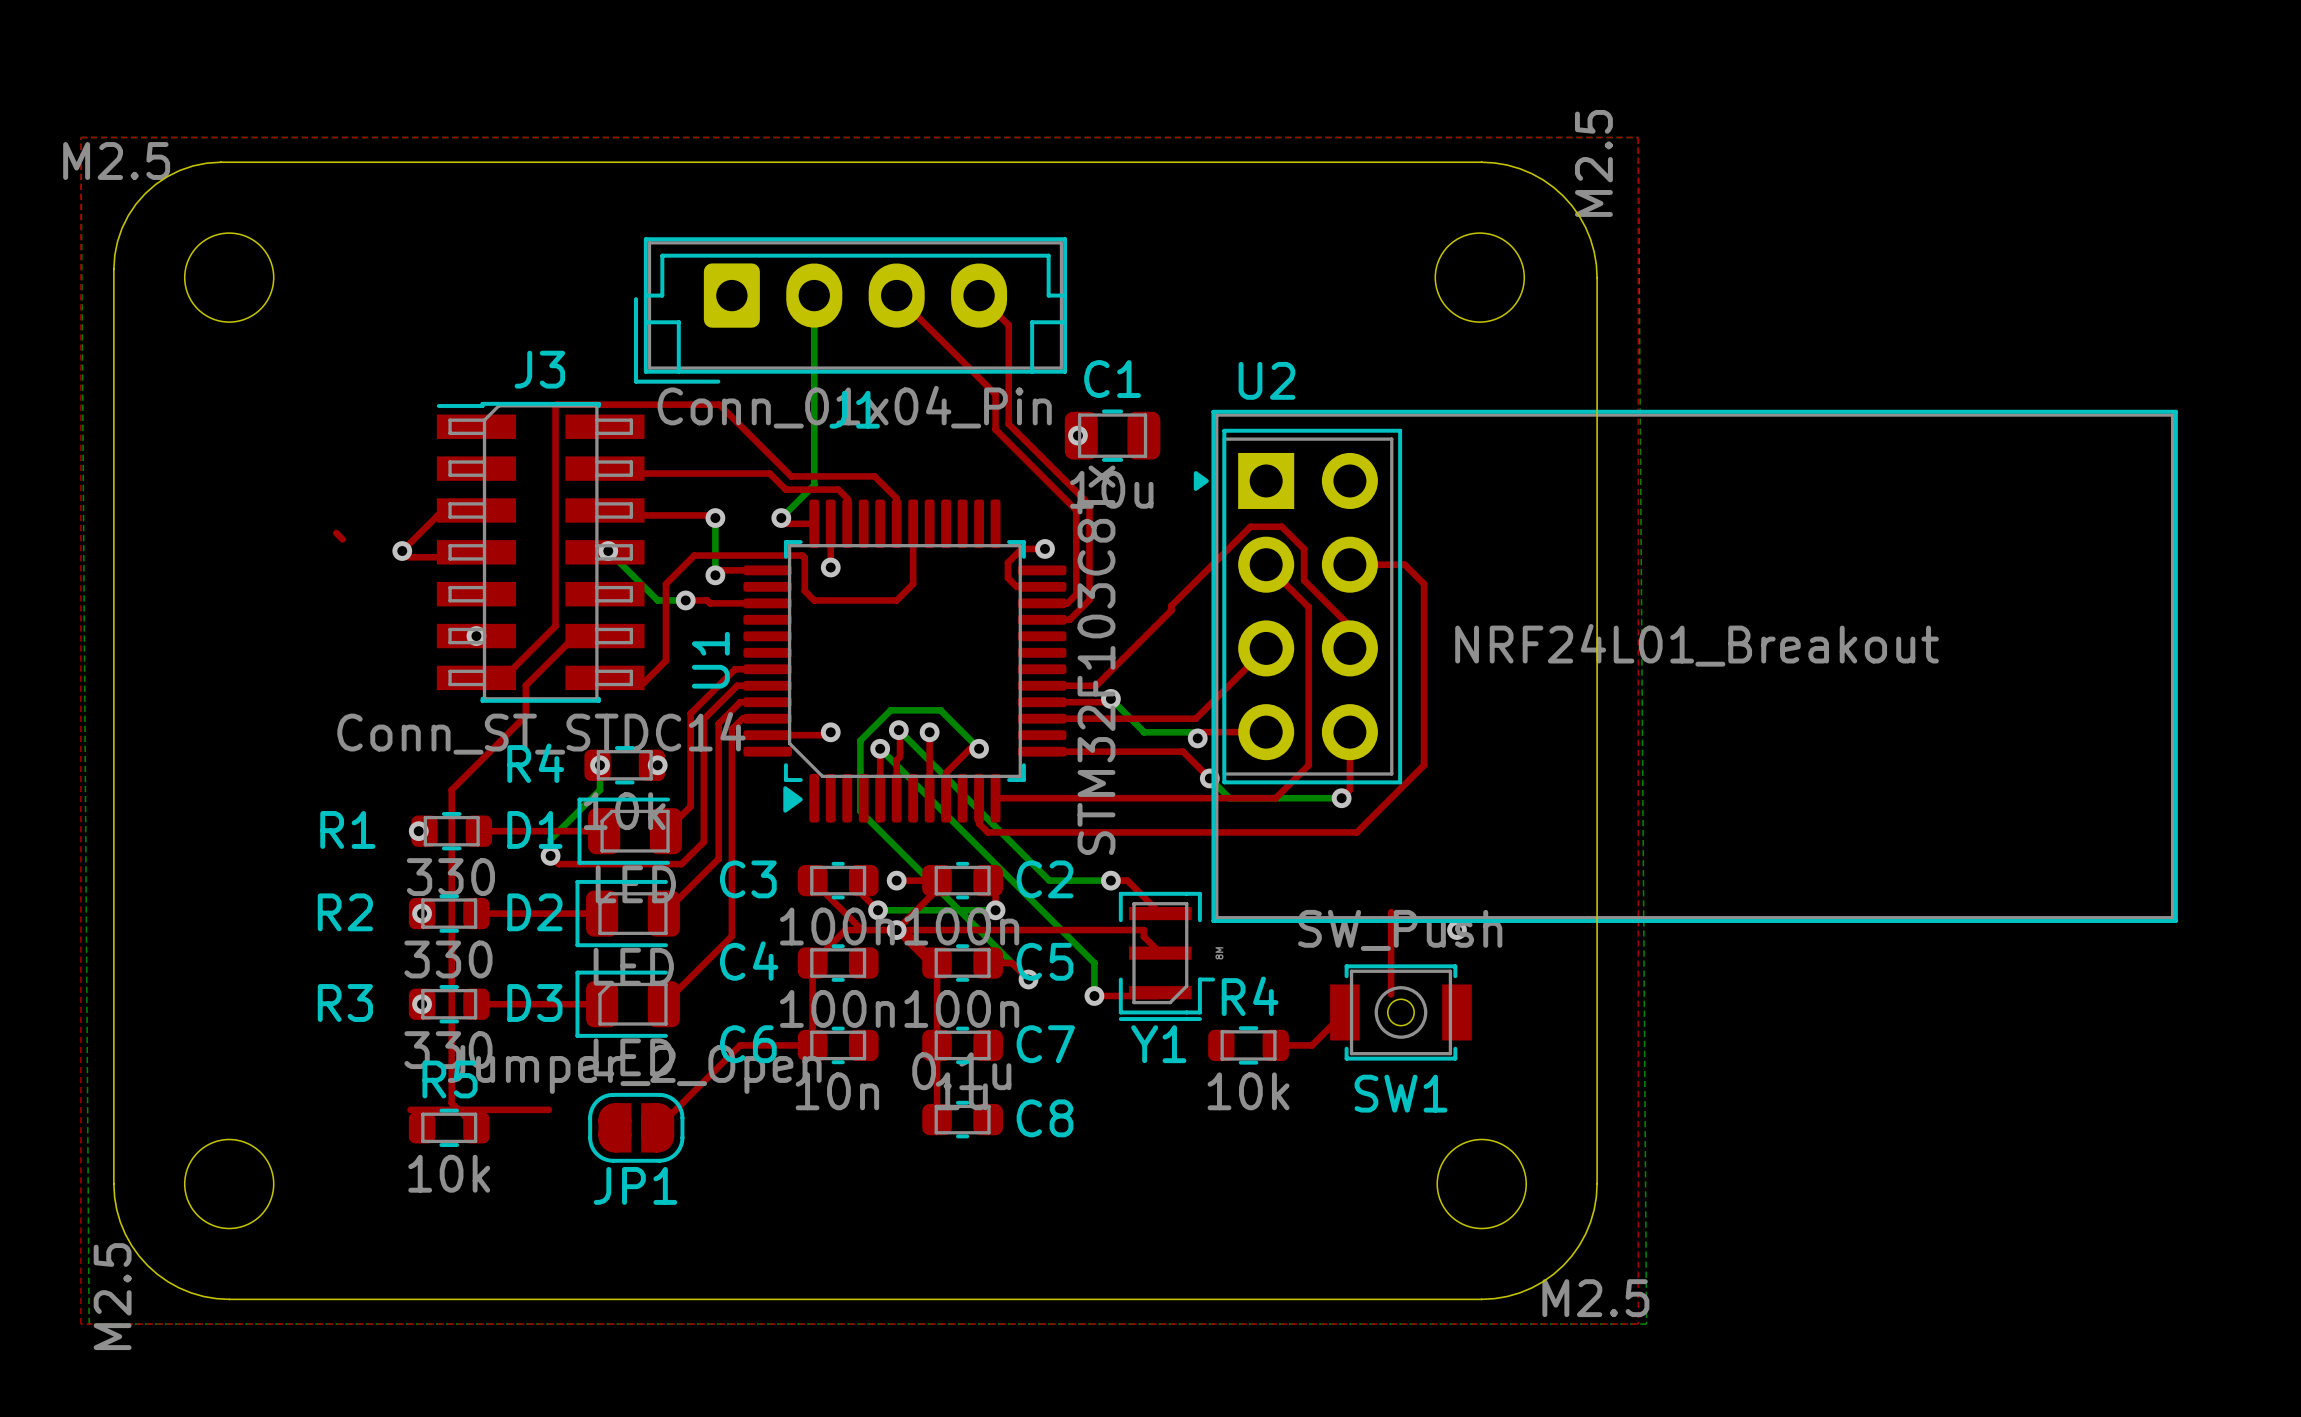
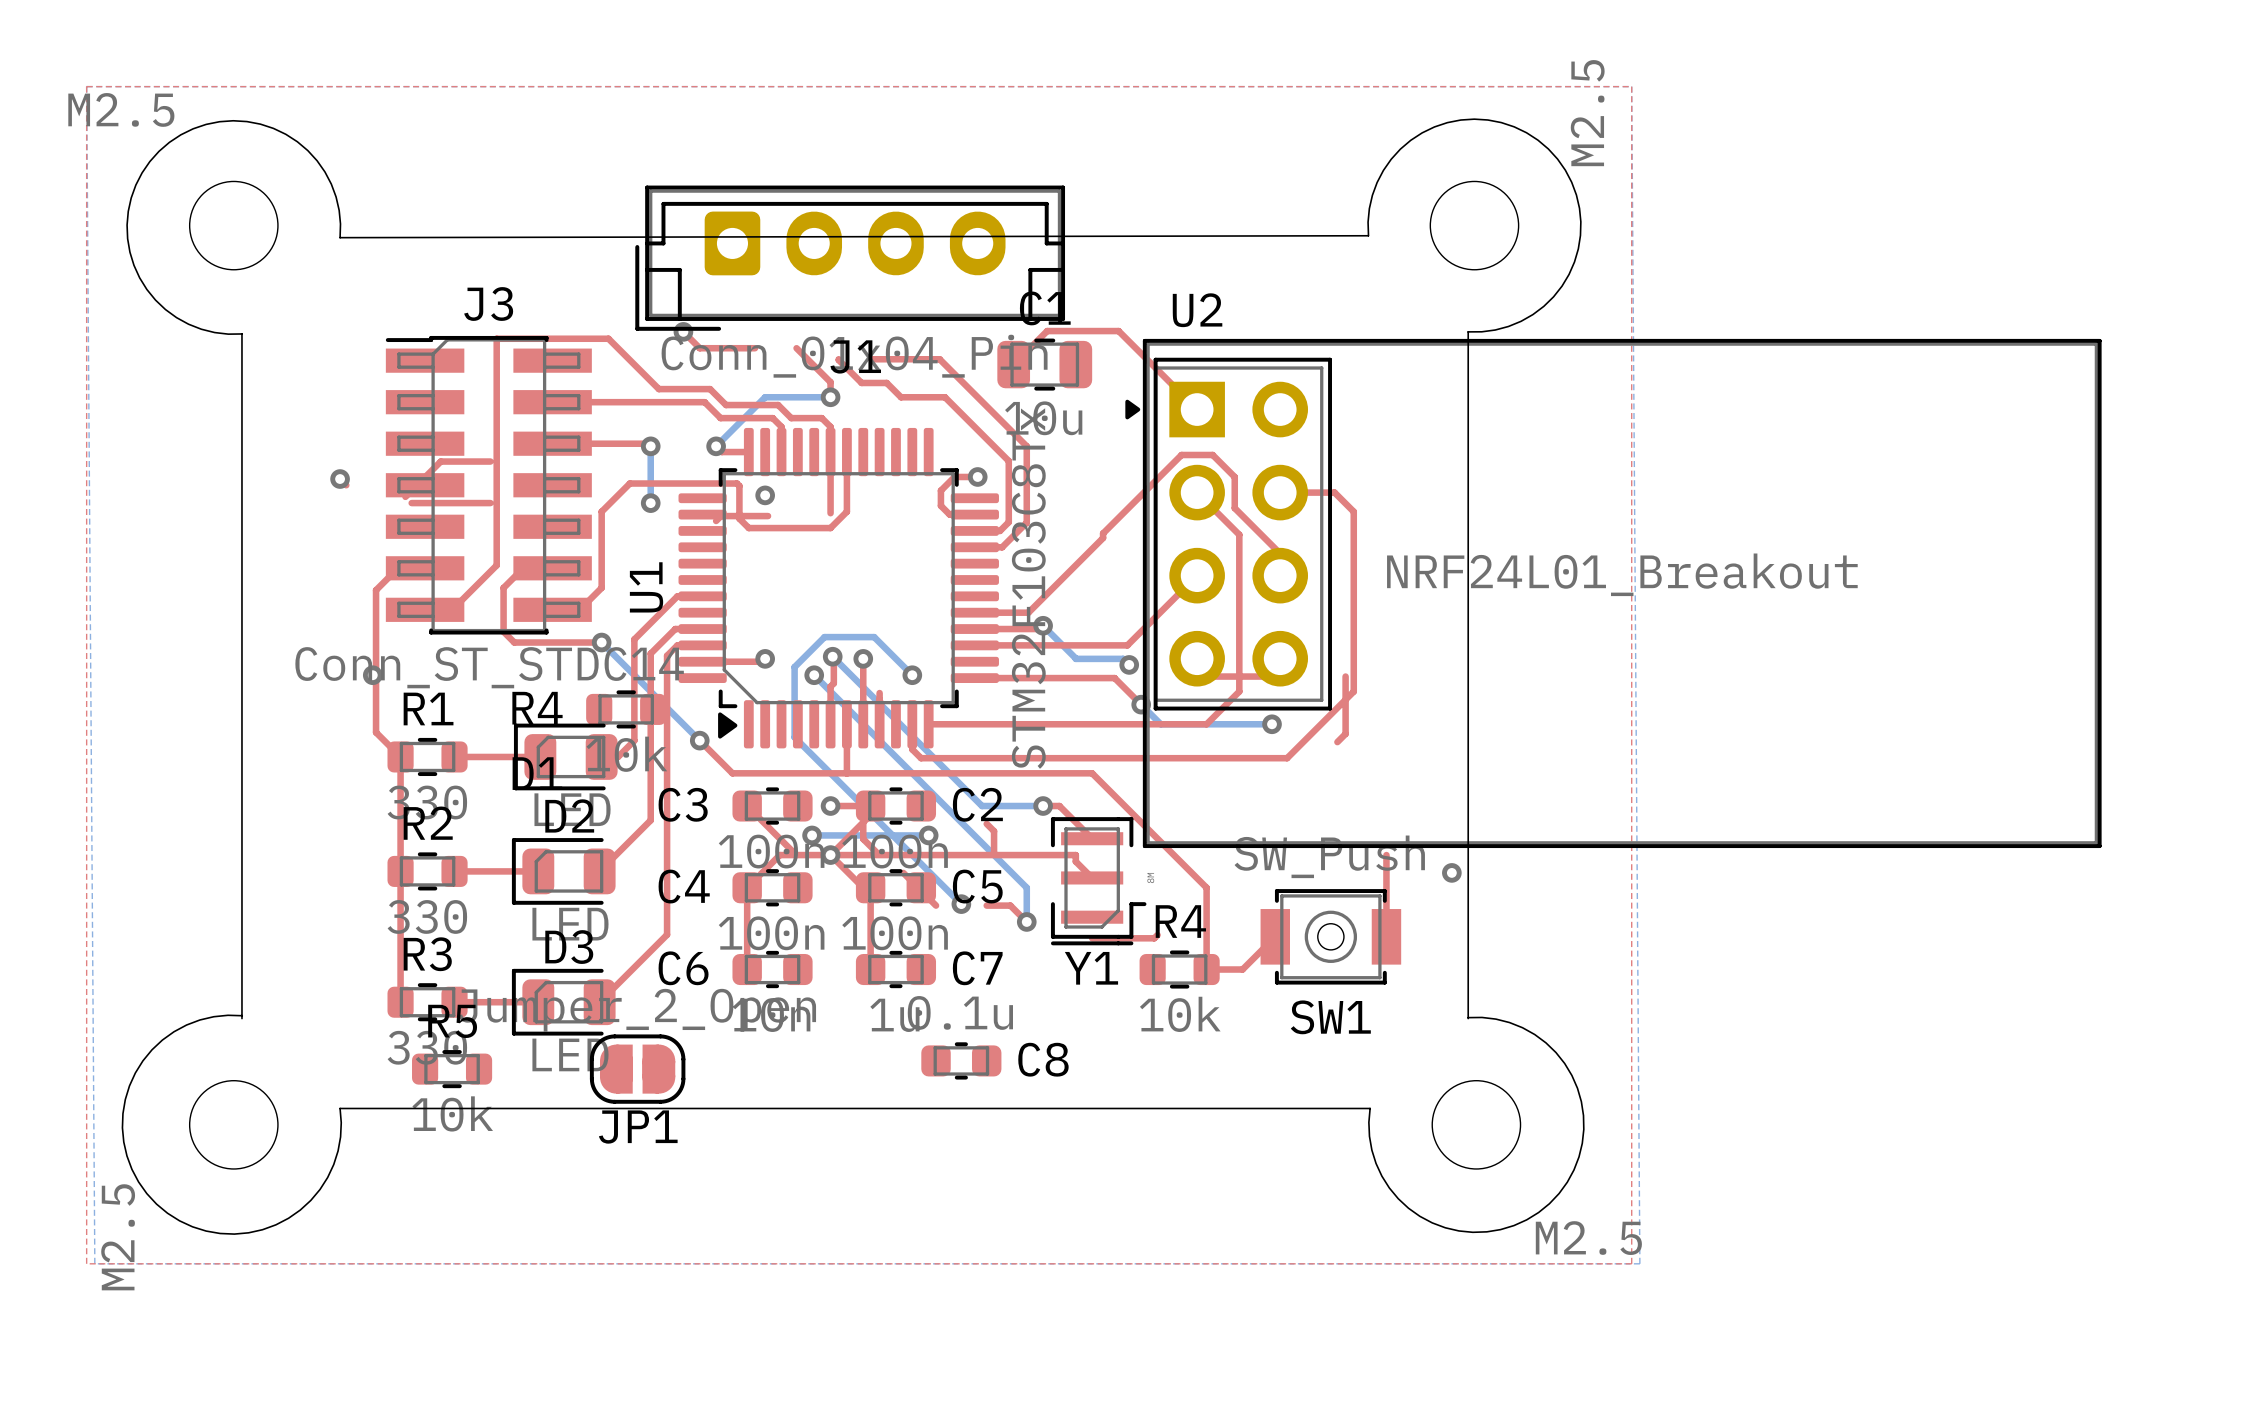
board edge: (220, 162) (1481, 162) (1519, 168) (1553, 187) (1571, 205) (1585, 227) (1594, 251) (1597, 277) (1597, 1184) (1590, 1222) (1571, 1255) (1553, 1274) (1531, 1287) (1507, 1296) (1481, 1299) (229, 1299) (191, 1292) (157, 1274) (139, 1255) (125, 1234) (116, 1209) (113, 1184) (113, 269) (114, 255) (122, 228) (128, 215) (145, 193) (167, 176) (179, 170) (207, 163) (220, 162) -> none
bottom track: (814, 295) (814, 485) (781, 518) -> none
top track: (896, 295) (995, 394) (995, 429) (1076, 510) (1076, 594) (1067, 603) (1042, 603) -> none
top track: (979, 295) (1008, 325) (1008, 424) (1089, 504) (1089, 599) (1069, 619) (1042, 619) -> none
top track: none -> (683, 331) (699, 348) (755, 348)
via: none -> (683, 331)
top track: none -> (796, 348) (830, 382) (830, 397)
top track: none -> (838, 359) (861, 382) (886, 382) (901, 397) (945, 397) (1008, 461) (1008, 522) (1000, 530) (974, 530)
top track: none -> (871, 359) (939, 359) (1026, 446) (1026, 522) (1002, 547) (974, 547)
top track: none -> (1013, 364) (1047, 331) (1118, 331) (1197, 409)
via: (1077, 435) -> none
C1 position: (1112, 435) -> (1044, 364)
bottom track: none -> (830, 397) (765, 397) (716, 446)
via: none -> (830, 397)
top track: none -> (552, 402) (704, 402) (720, 418) (772, 418) (781, 426) (781, 452)
top track: (616, 473) (769, 473) (785, 489) (838, 489) (847, 498) (847, 505) -> none
via: none -> (650, 446)
top track: none -> (830, 452) (830, 426) (821, 418) (791, 418) (778, 405) (726, 405) (710, 389) (658, 389) (608, 338) (496, 338) (496, 565) (452, 609) (425, 609)
top track: (616, 515) (712, 515) (715, 518) -> (552, 443) (648, 443) (650, 446)
bottom track: (715, 518) (715, 575) -> (650, 446) (650, 503)
via position: (715, 518) -> (716, 446)
top track: (781, 518) (787, 523) (814, 523) -> (716, 446) (721, 452) (748, 452)
via: (781, 518) -> none
top track: none -> (846, 469) (846, 511) (830, 528) (748, 528) (739, 518) (739, 485) (736, 483) (629, 483) (601, 511) (601, 587) (579, 609) (552, 609)
top track: (896, 523) (896, 498) (874, 476) (791, 476) (719, 404) (556, 404) (555, 626) (503, 677) (476, 677) -> none
top track: (913, 523) (913, 583) (896, 600) (814, 600) (804, 590) (804, 558) (802, 555) (694, 555) (665, 583) (665, 660) (643, 682) (616, 682) -> none
via: none -> (977, 476)
top track: (1045, 548) (1021, 548) (1007, 562) (1007, 578) (1016, 586) (1042, 586) -> (977, 476) (954, 476) (940, 490) (940, 505) (949, 514) (974, 514)
via: (1045, 548) -> none
via: none -> (765, 495)
via position: (402, 551) -> (340, 479)
bottom track: (608, 551) (657, 600) (685, 600) -> none
via: (608, 551) -> none
J3 position: (540, 552) -> (488, 485)
via: none -> (650, 503)
top track: (1266, 564) (1308, 607) (1308, 765) (1275, 798) (995, 798) -> (1197, 492) (1239, 534) (1239, 691) (1206, 724) (928, 724)
top track: (1349, 564) (1404, 564) (1424, 583) (1424, 765) (1356, 832) (987, 832) (979, 823) (979, 798) -> (1280, 492) (1334, 492) (1353, 511) (1353, 691) (1287, 758) (921, 758) (912, 749) (912, 724)
via: (830, 567) -> none
via: (715, 575) -> none
top track: (685, 600) (707, 600) (710, 603) (767, 603) -> none
via: (685, 600) -> none
top track: none -> (425, 568) (397, 568) (376, 590) (376, 671) (372, 675) (376, 678) (376, 732) (400, 756) (400, 1002)
top track: none -> (552, 568) (523, 568) (503, 587) (503, 631) (514, 642) (601, 642)
via: (476, 636) -> none
top track: (604, 636) (575, 636) (525, 685) (525, 715) (451, 789) (451, 1103) (476, 1127) -> none
top track: (1266, 648) (1195, 718) (1042, 718) -> (1197, 575) (1127, 645) (974, 645)
top track: (1349, 648) (1349, 626) (1304, 580) (1304, 548) (1281, 526) (1250, 526) (1171, 605) (1171, 610) (1096, 685) (1042, 685) -> (1280, 575) (1280, 553) (1234, 508) (1234, 477) (1212, 454) (1181, 454) (1103, 533) (1103, 538) (1028, 612) (974, 612)
top track: none -> (702, 596) (677, 596) (634, 639) (634, 740) (618, 756) (601, 756)
U1 position: (904, 661) -> (838, 588)
U2 position: (1685, 666) -> (1613, 593)
top track: (767, 669) (735, 669) (690, 713) (690, 806) (665, 831) -> none
via: none -> (1043, 625)
top track: none -> (702, 629) (675, 629) (650, 653) (650, 820) (599, 871)
top track: (767, 685) (737, 685) (703, 719) (703, 841) (681, 864) (558, 864) (550, 855) -> none
bottom track: none -> (601, 642) (699, 740)
via: none -> (601, 642)
top track: (1110, 698) (1107, 702) (1042, 702) -> (1043, 625) (1039, 629) (974, 629)
bottom track: (1110, 698) (1143, 731) -> (1043, 625) (1075, 658)
via position: (1110, 698) -> (1129, 664)
top track: none -> (702, 645) (677, 645) (667, 655) (667, 934) (599, 1002)
top track: (767, 702) (740, 702) (718, 723) (718, 858) (663, 913) -> none
via: none -> (832, 656)
via: none -> (765, 658)
via: none -> (863, 658)
top track: (767, 718) (742, 718) (731, 729) (731, 936) (663, 1004) -> none
via: none -> (372, 675)
top track: (898, 730) (899, 756) (896, 760) (896, 798) -> (832, 656) (833, 683) (830, 686) (830, 724)
bottom track: (898, 730) (1049, 880) (1110, 880) -> (832, 656) (982, 806) (1043, 806)
via: (898, 730) -> none
via: none -> (912, 675)
top track: (830, 732) (827, 735) (767, 735) -> (765, 658) (762, 661) (702, 661)
via position: (830, 732) -> (814, 675)
top track: (929, 732) (929, 798) -> (863, 658) (863, 724)
via: (929, 732) -> none
bottom track: (1143, 732) (1191, 732) (1197, 738) -> (1075, 658) (1123, 658) (1129, 664)
via: (1197, 738) -> none
bottom track: (880, 748) (1094, 963) (1094, 995) -> (814, 675) (1026, 887) (1026, 920)
via: (880, 748) -> none
top track: (979, 748) (970, 748) (946, 772) (946, 798) -> none
bottom track: (979, 748) (940, 710) (890, 710) (860, 740) (860, 811) (1028, 979) -> (912, 675) (874, 637) (824, 637) (794, 667) (794, 737) (961, 904)
via: (979, 748) -> none
top track: (1042, 751) (1183, 751) (1209, 778) -> (974, 678) (1114, 678) (1141, 704)
via: none -> (1141, 704)
bottom track: (600, 765) (600, 789) (550, 839) (550, 855) -> none
via: (600, 765) -> none
via: (657, 765) -> none
bottom track: (1209, 778) (1229, 798) (1341, 798) -> (1141, 704) (1160, 724) (1272, 724)
via: (1209, 778) -> none
top track: none -> (846, 724) (846, 773)
via: none -> (1272, 724)
top track: none -> (699, 740) (732, 773) (1092, 773) (1206, 887) (1206, 969) (1242, 969) (1275, 936)
via: none -> (699, 740)
via: (1341, 798) -> none
top track: none -> (454, 756) (540, 756)
R1 name position: R1 (347, 829) -> R1 (428, 708)
via: (418, 831) -> none
R1 position: (451, 831) -> (427, 756)
top track: (478, 831) (604, 831) -> none
D1 position: (629, 831) -> (565, 756)
via: (550, 855) -> none
top track: none -> (830, 806) (870, 806) (870, 815) (830, 855) (870, 895) (870, 969)
via: none -> (830, 806)
via: none -> (1043, 806)
top track: (812, 880) (862, 930) -> (747, 806) (796, 855)
C3 position: (838, 880) -> (772, 806)
top track: (896, 880) (937, 880) (937, 889) (896, 930) (937, 970) (937, 1119) -> none
via: (896, 880) -> none
C2 position: (962, 880) -> (895, 806)
top track: (1110, 880) (1127, 880) (1160, 913) -> (1043, 806) (1059, 806) (1092, 838)
via: (1110, 880) -> none
via: none -> (812, 835)
via: none -> (928, 835)
bottom track: (878, 910) (995, 910) -> (812, 835) (928, 835)
via: (878, 910) -> none
via: (995, 910) -> none
R2 name position: R2 (345, 912) -> R2 (428, 823)
D2 name position: D2 (534, 912) -> D2 (569, 815)
via: none -> (830, 855)
via: (422, 913) -> none
R2 position: (449, 913) -> (427, 871)
top track: (476, 913) (602, 913) -> none
D2 position: (627, 913) -> (563, 871)
top track: none -> (454, 871) (538, 871)
via: (896, 930) -> none
top track: none -> (1092, 877) (1075, 861) (1075, 855) (779, 855) (747, 887) (747, 969)
top track: (1160, 953) (1143, 936) (1143, 930) (845, 930) (812, 963) (812, 1045) (740, 1045) (657, 1127) -> none
Y1 position: (1166, 956) -> (1098, 881)
via: none -> (961, 904)
C4 position: (838, 963) -> (772, 887)
C5 position: (962, 963) -> (895, 887)
via: (1094, 995) -> none
R3 name position: R3 (345, 1002) -> R3 (427, 954)
D3 name position: D3 (534, 1002) -> D3 (569, 947)
via: (422, 1004) -> none
R3 position: (449, 1004) -> (427, 1002)
top track: (476, 1004) (602, 1004) -> none
D3 position: (627, 1004) -> (563, 1002)
top track: (1344, 1012) (1311, 1045) (1275, 1045) -> none
SW1 position: (1400, 1012) -> (1330, 936)
C6 position: (838, 1045) -> (772, 969)
C7 position: (962, 1045) -> (895, 969)
R4 position: (1248, 1045) -> (1179, 969)
top track: none -> (454, 1002) (538, 1002)
board edge: none -> (242, 1015) (213, 1016) (199, 1019) (186, 1025) (162, 1040) (142, 1060) (135, 1072) (129, 1085) (122, 1113) (122, 1127) (126, 1155) (131, 1169) (146, 1193) (167, 1213) (179, 1220) (192, 1226) (220, 1233) (234, 1234) (262, 1229) (288, 1218) (310, 1200) (327, 1177) (338, 1150) (340, 1136) (340, 1108) (1370, 1108) (1369, 1136) (1376, 1163) (1389, 1187) (1408, 1208) (1419, 1216) (1445, 1227) (1472, 1232) (1500, 1229) (1526, 1219) (1538, 1212) (1549, 1203) (1567, 1182) (1579, 1156) (1582, 1143) (1583, 1129) (1581, 1101) (1571, 1075) (1555, 1052) (1545, 1042) (1522, 1027) (1509, 1022) (1495, 1019) (1468, 1017)
board edge: none -> (241, 1018) (241, 333) (214, 332) (201, 329) (176, 317) (165, 309) (146, 289) (133, 265) (129, 252) (127, 225) (131, 197) (142, 172) (159, 151) (169, 142) (193, 128) (219, 121) (246, 121) (273, 128) (285, 134) (307, 150) (324, 171) (336, 196) (339, 210) (340, 237) (1368, 235) (1369, 208) (1377, 182) (1391, 159) (1400, 149) (1422, 132) (1434, 126) (1447, 122) (1474, 119) (1501, 122) (1514, 126) (1526, 132) (1548, 148) (1557, 159) (1571, 182) (1579, 208) (1580, 221) (1578, 248) (1574, 262) (1562, 286) (1553, 296) (1532, 314) (1521, 321) (1495, 330) (1468, 331) (1468, 1018)
top track: (410, 1109) (548, 1109) -> none

